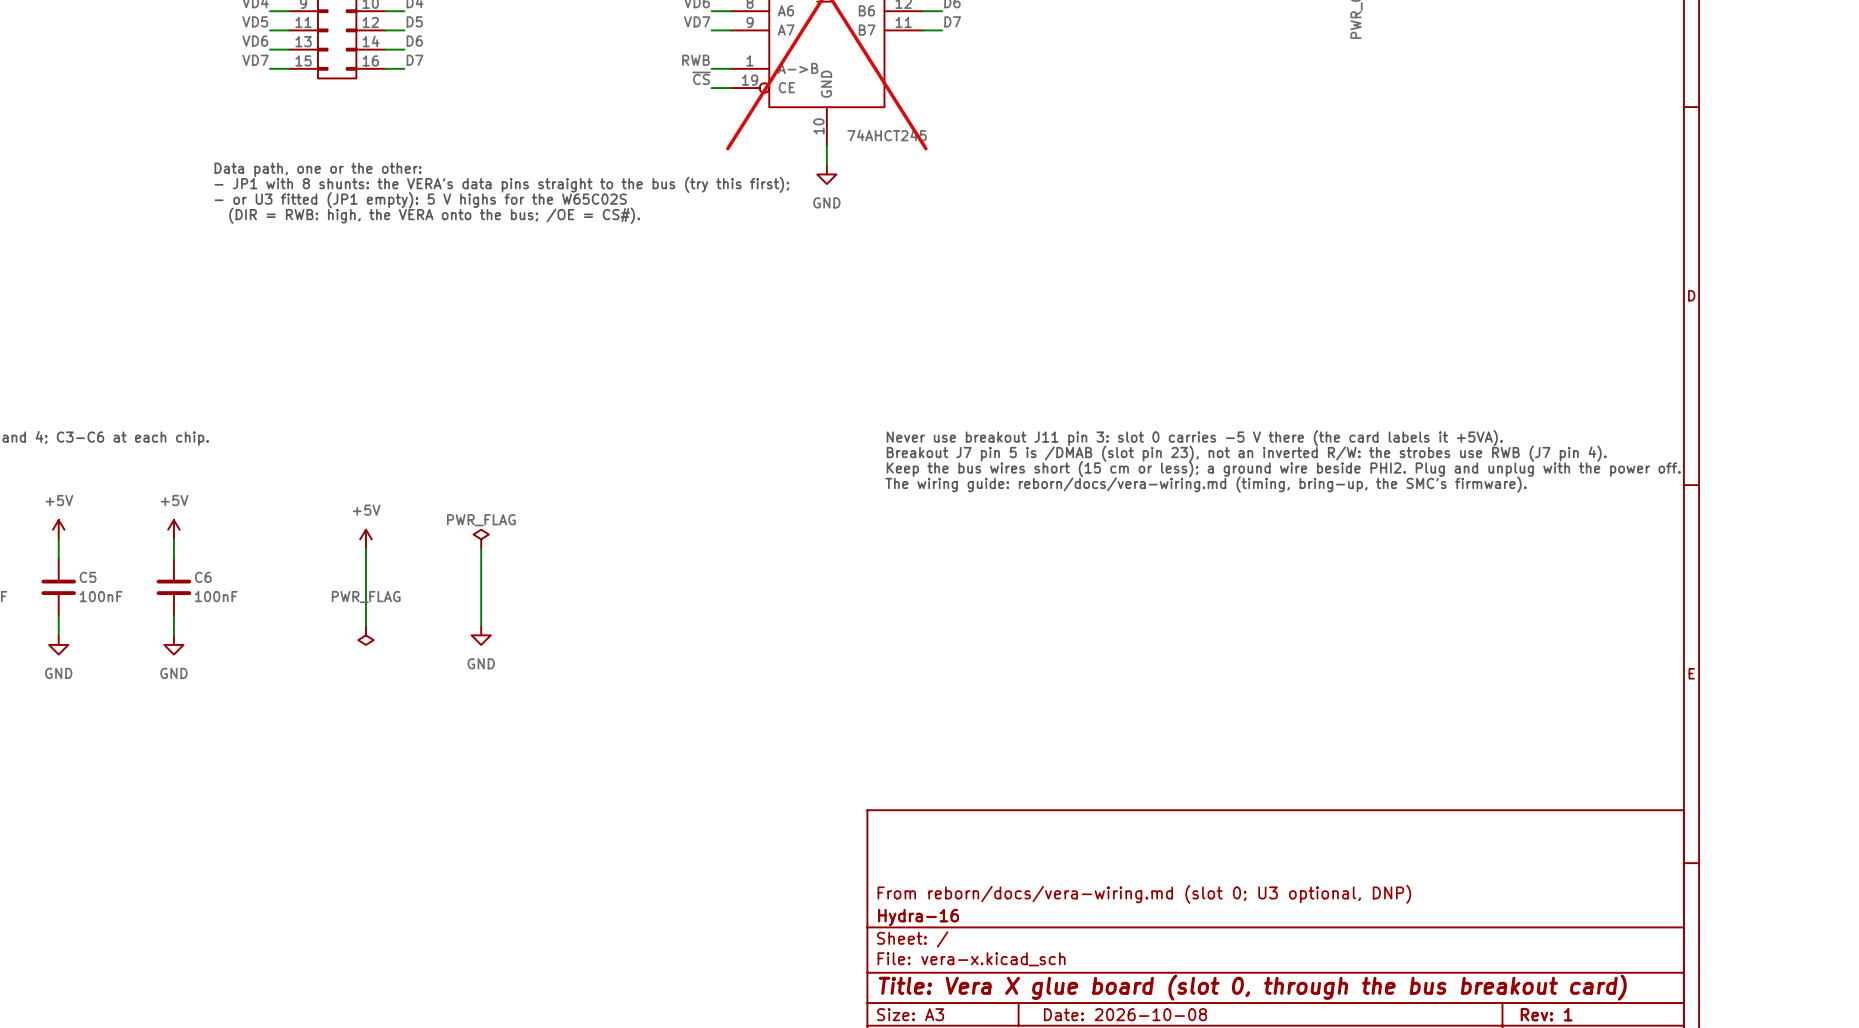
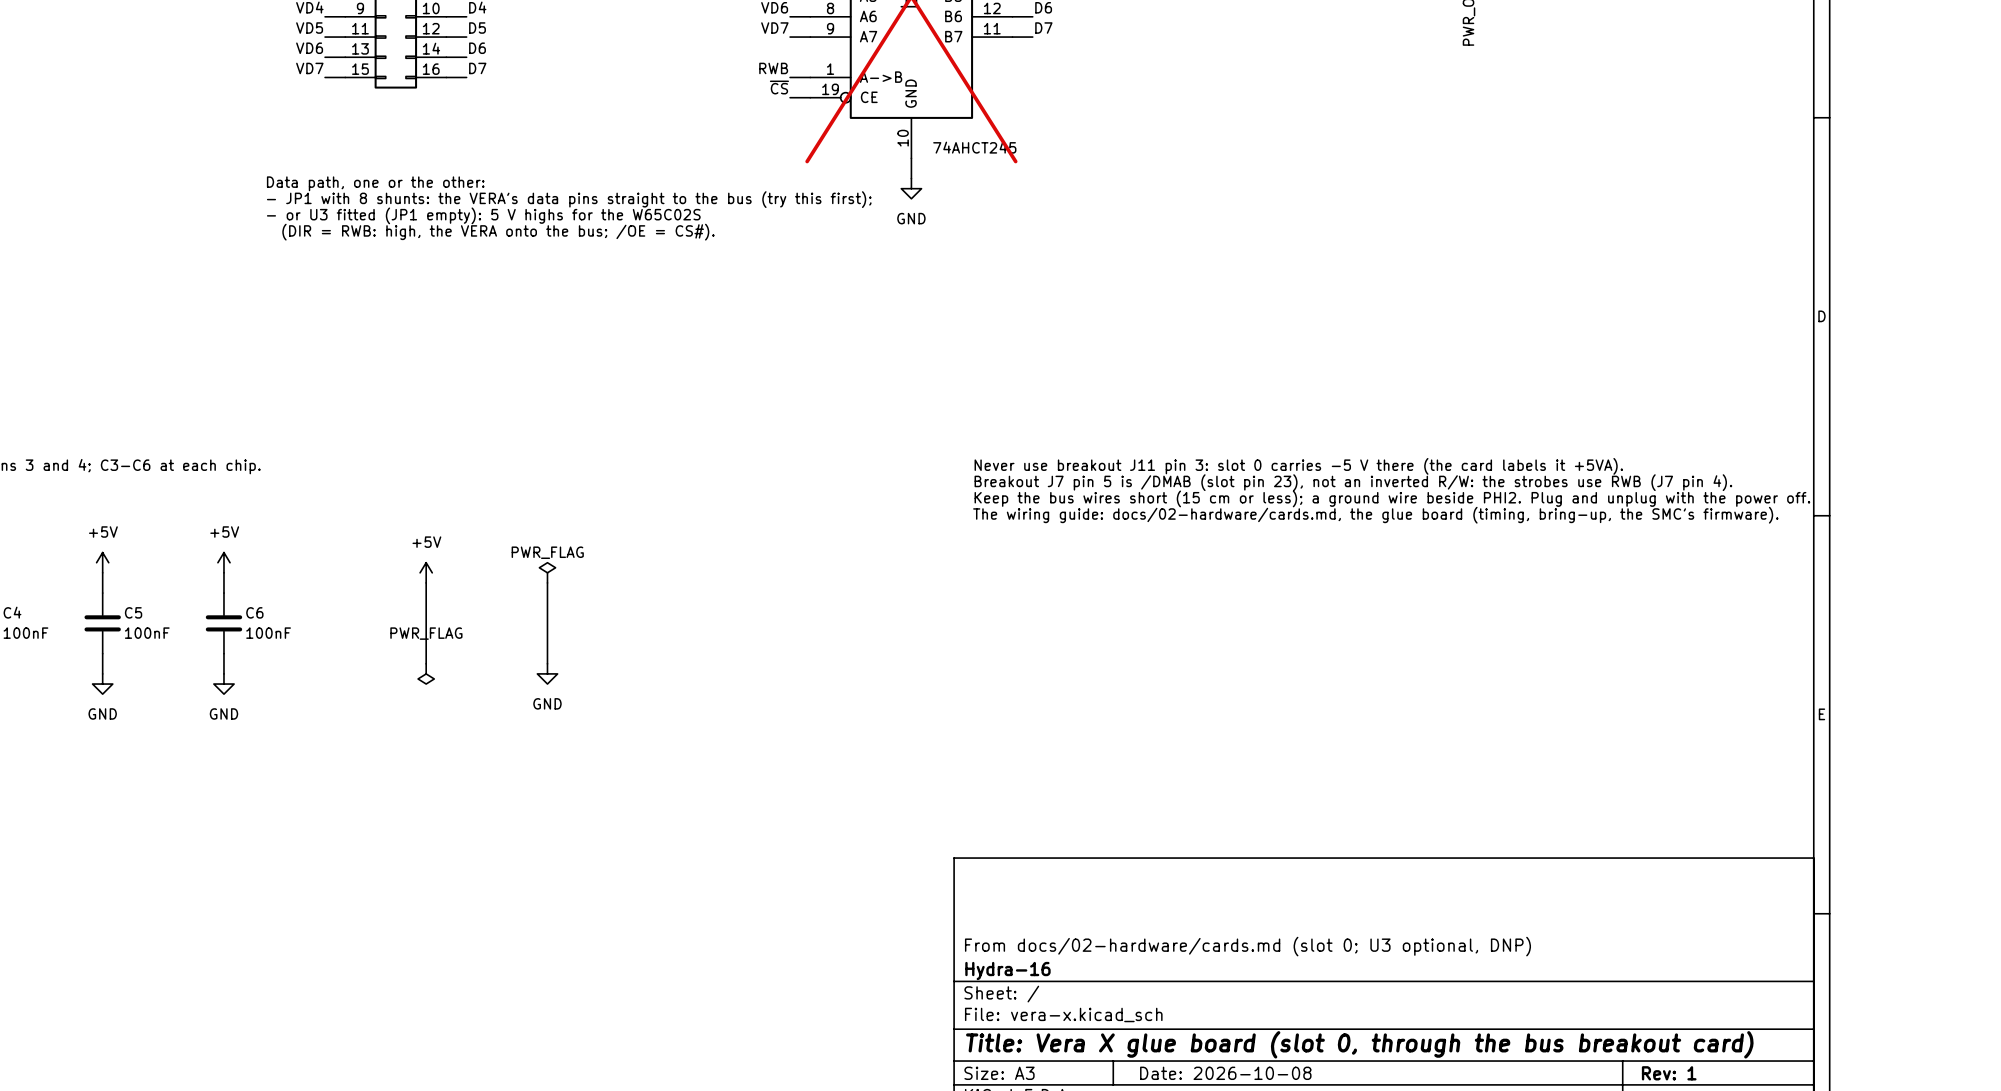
text: The wiring guide: reborn/docs/vera-wiring.md (timing, bring-up, the SMC's firmware). (1205, 484) -> The wiring guide: docs/02-hardware/cards.md, the glue board (timing, bring-up, the SMC's firmware). (1375, 515)
title block: From reborn/docs/vera-wiring.md (slot 0; U3 optional, DNP) (1144, 894) -> From docs/02-hardware/cards.md (slot 0; U3 optional, DNP) (1247, 946)

